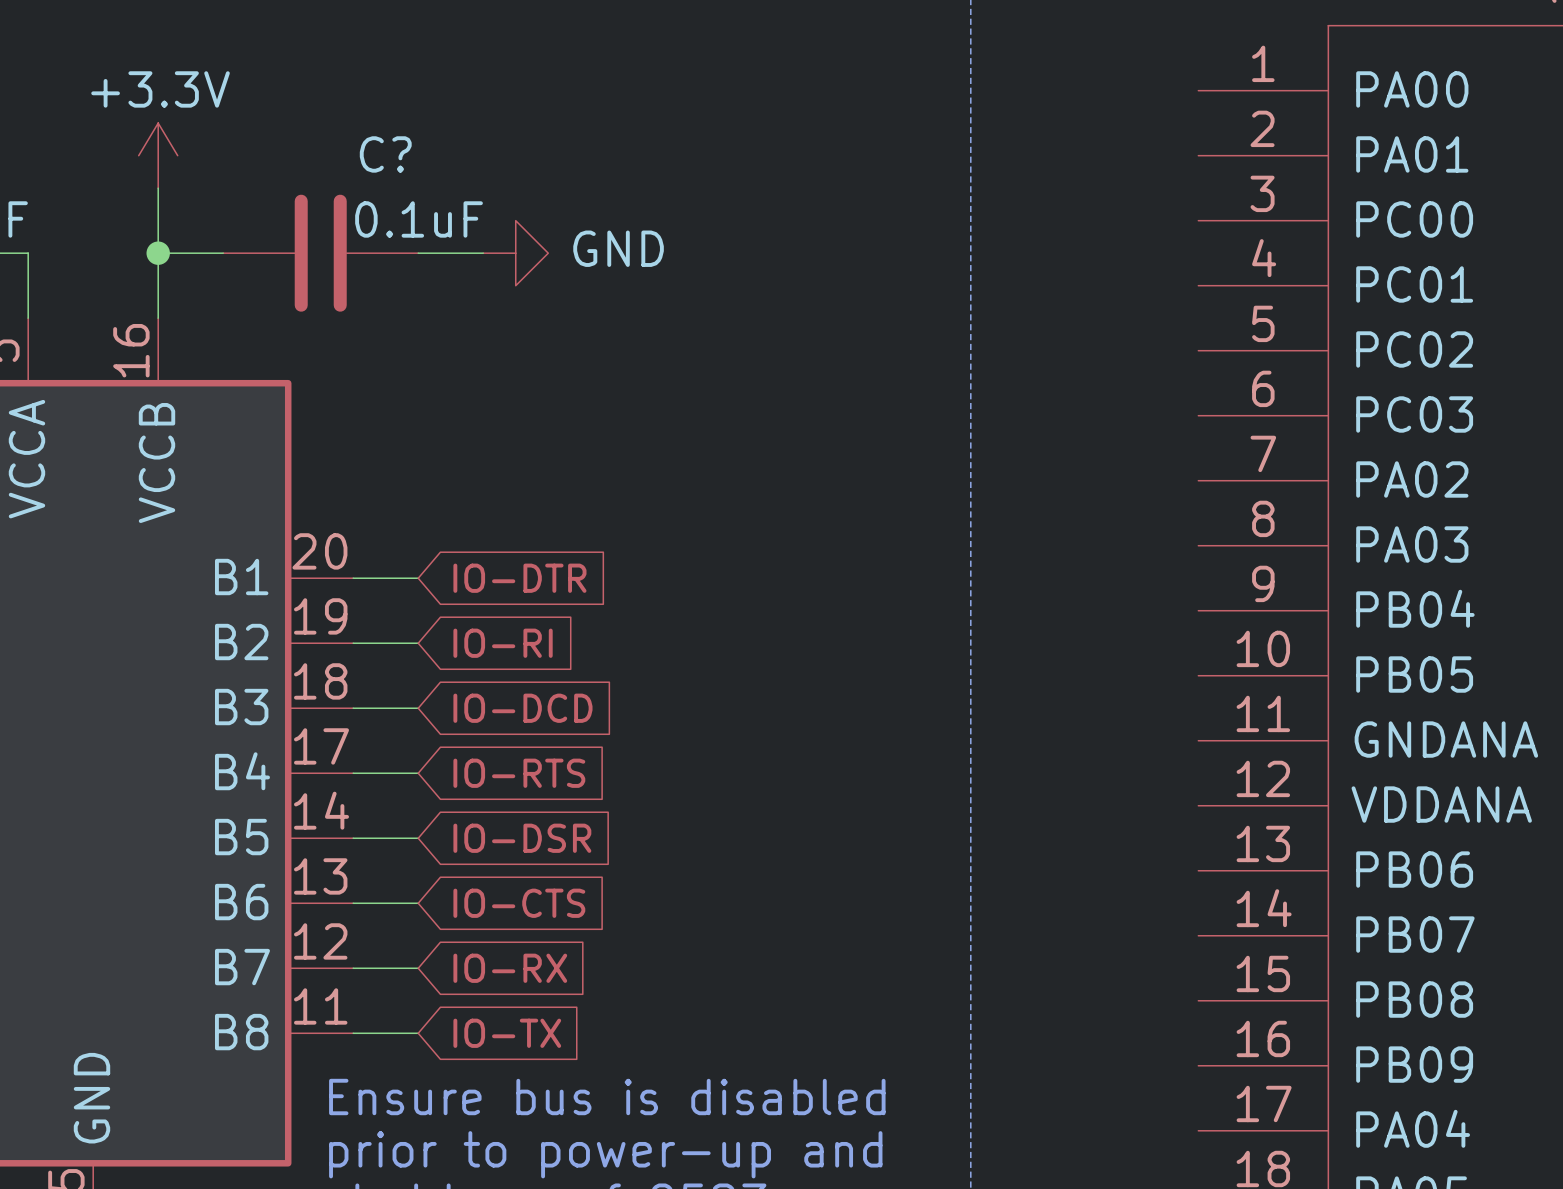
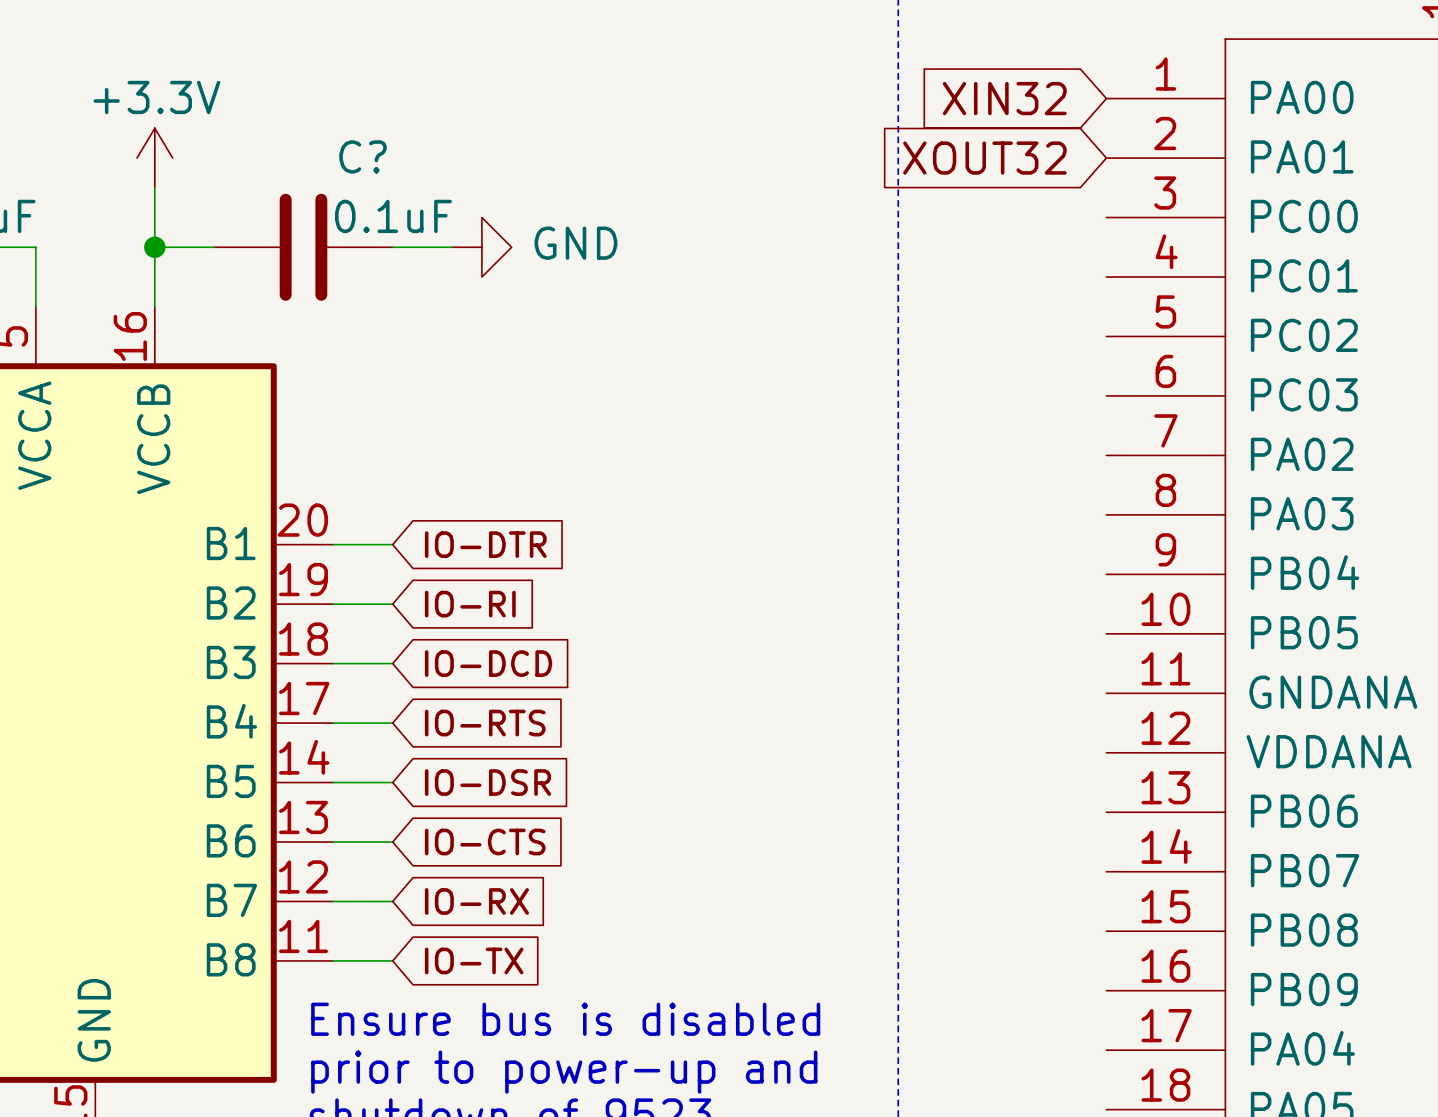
global label: none -> XIN32 (1004, 98)
global label: none -> XOUT32 (984, 158)

